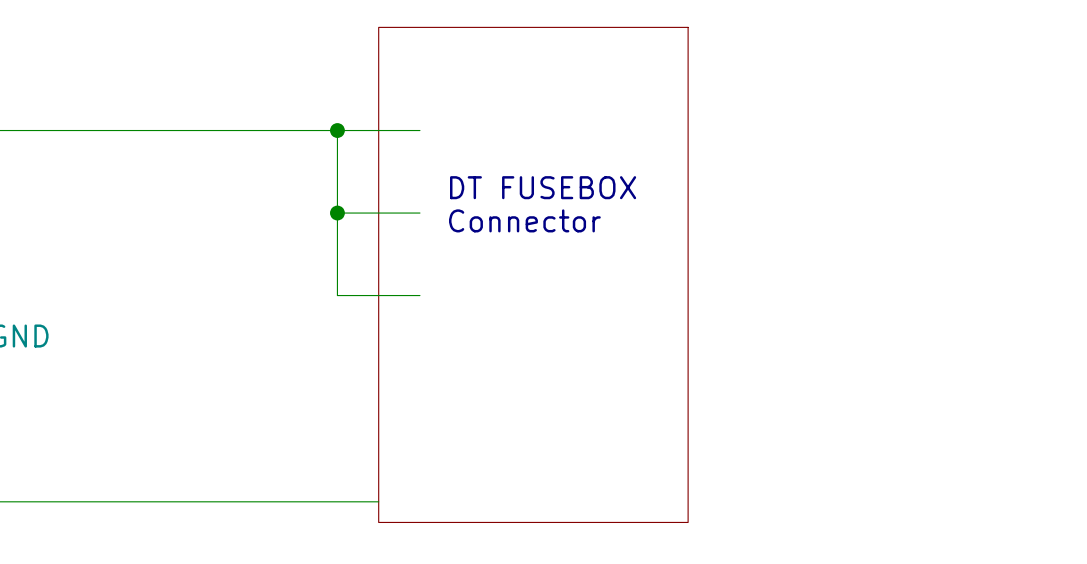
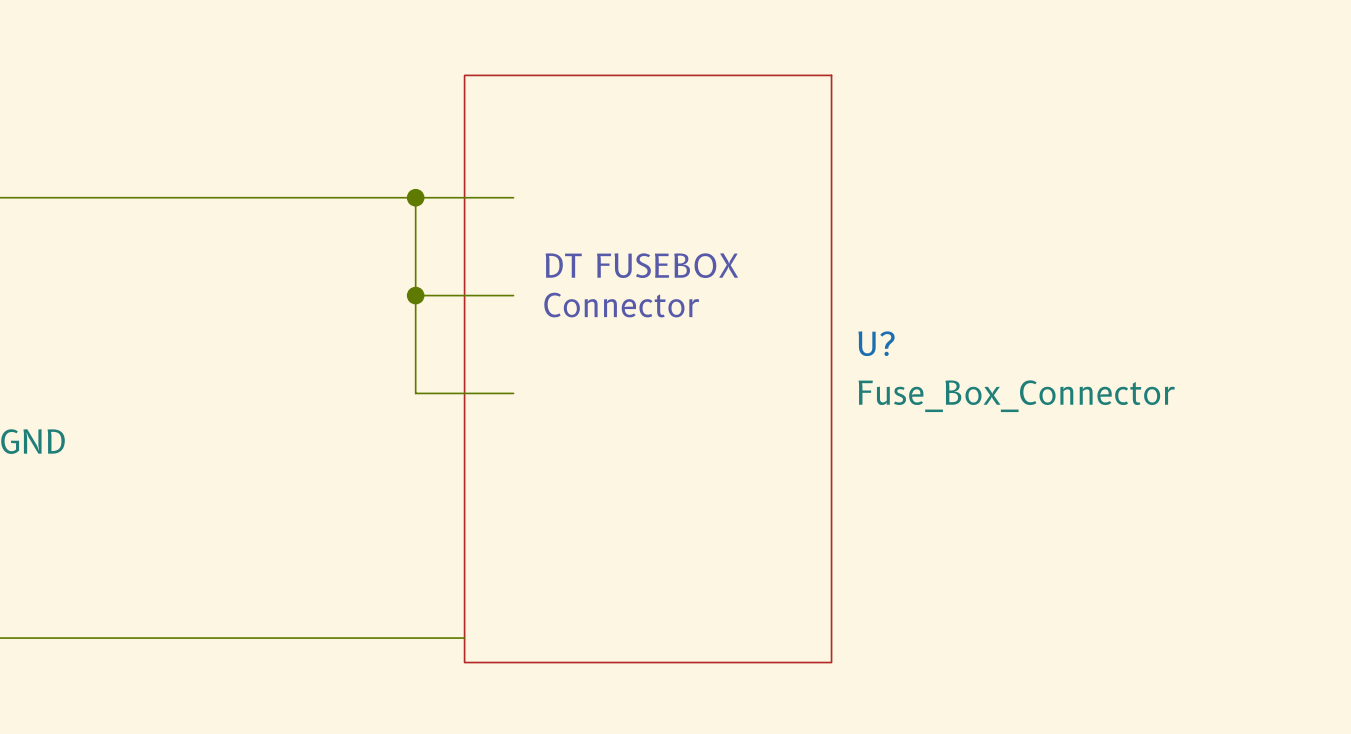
U? name: none -> U? (876, 343)
U? value: none -> Fuse_Box_Connector (1016, 396)

